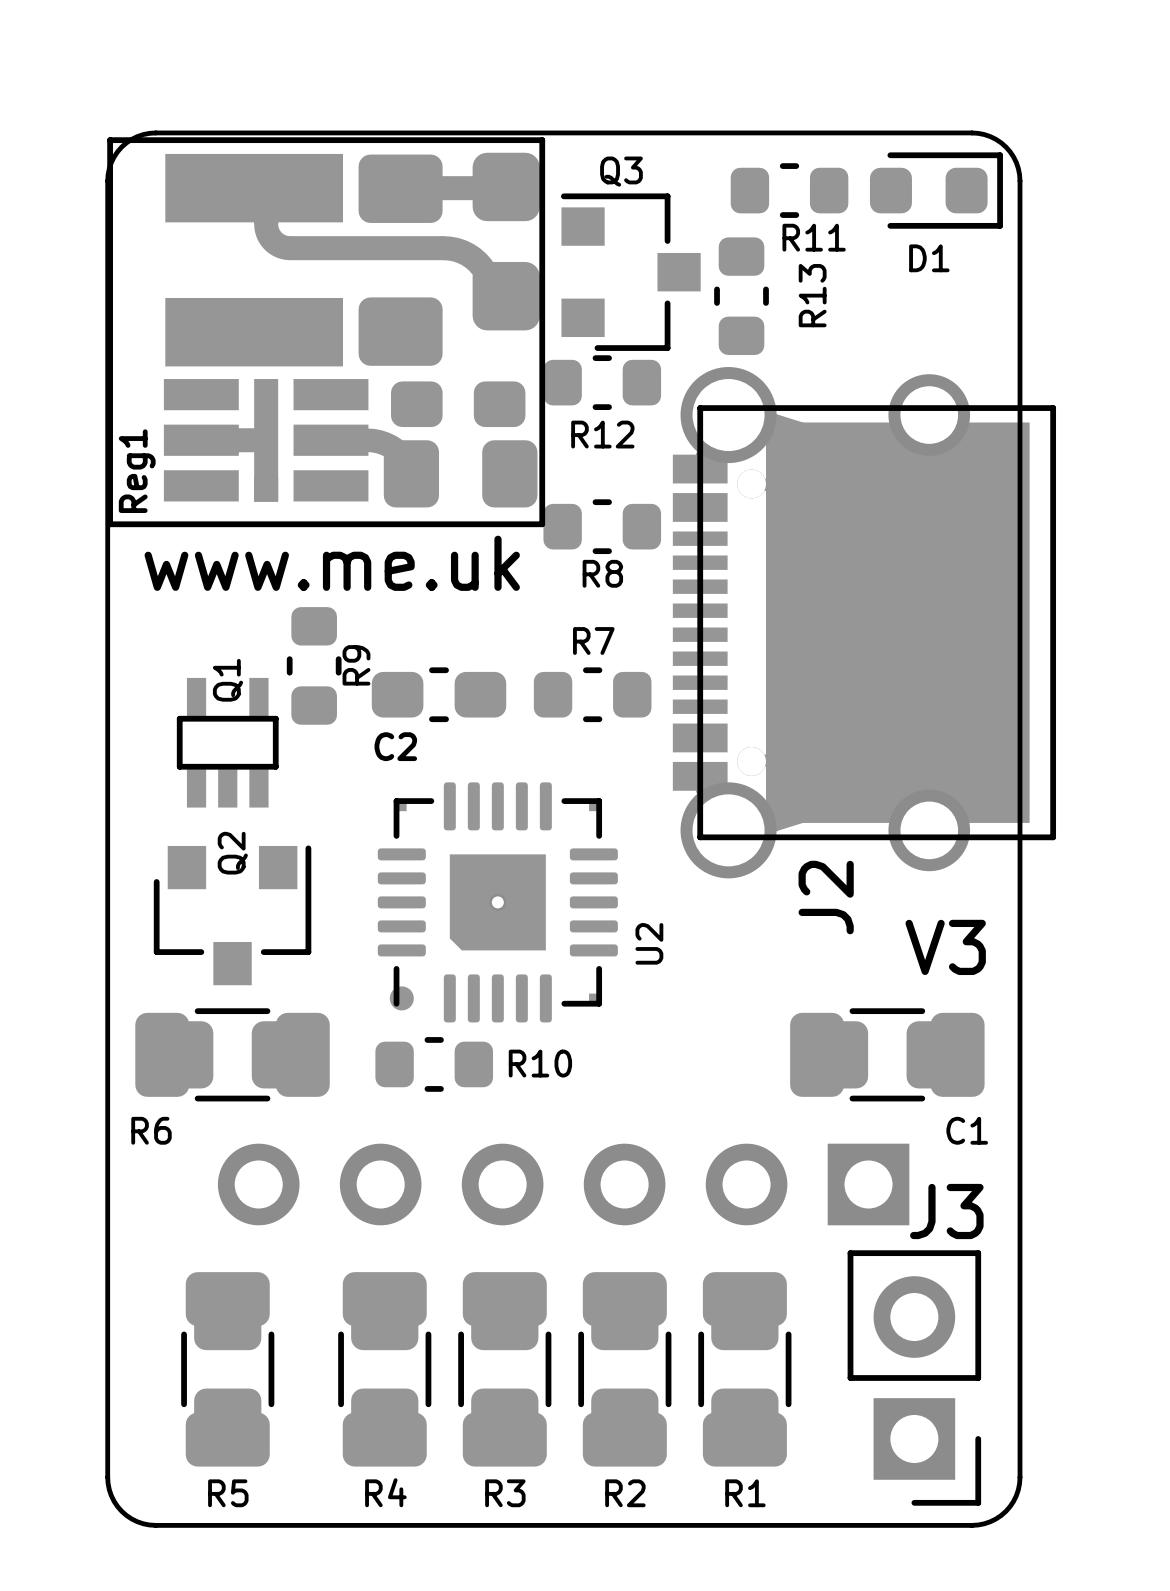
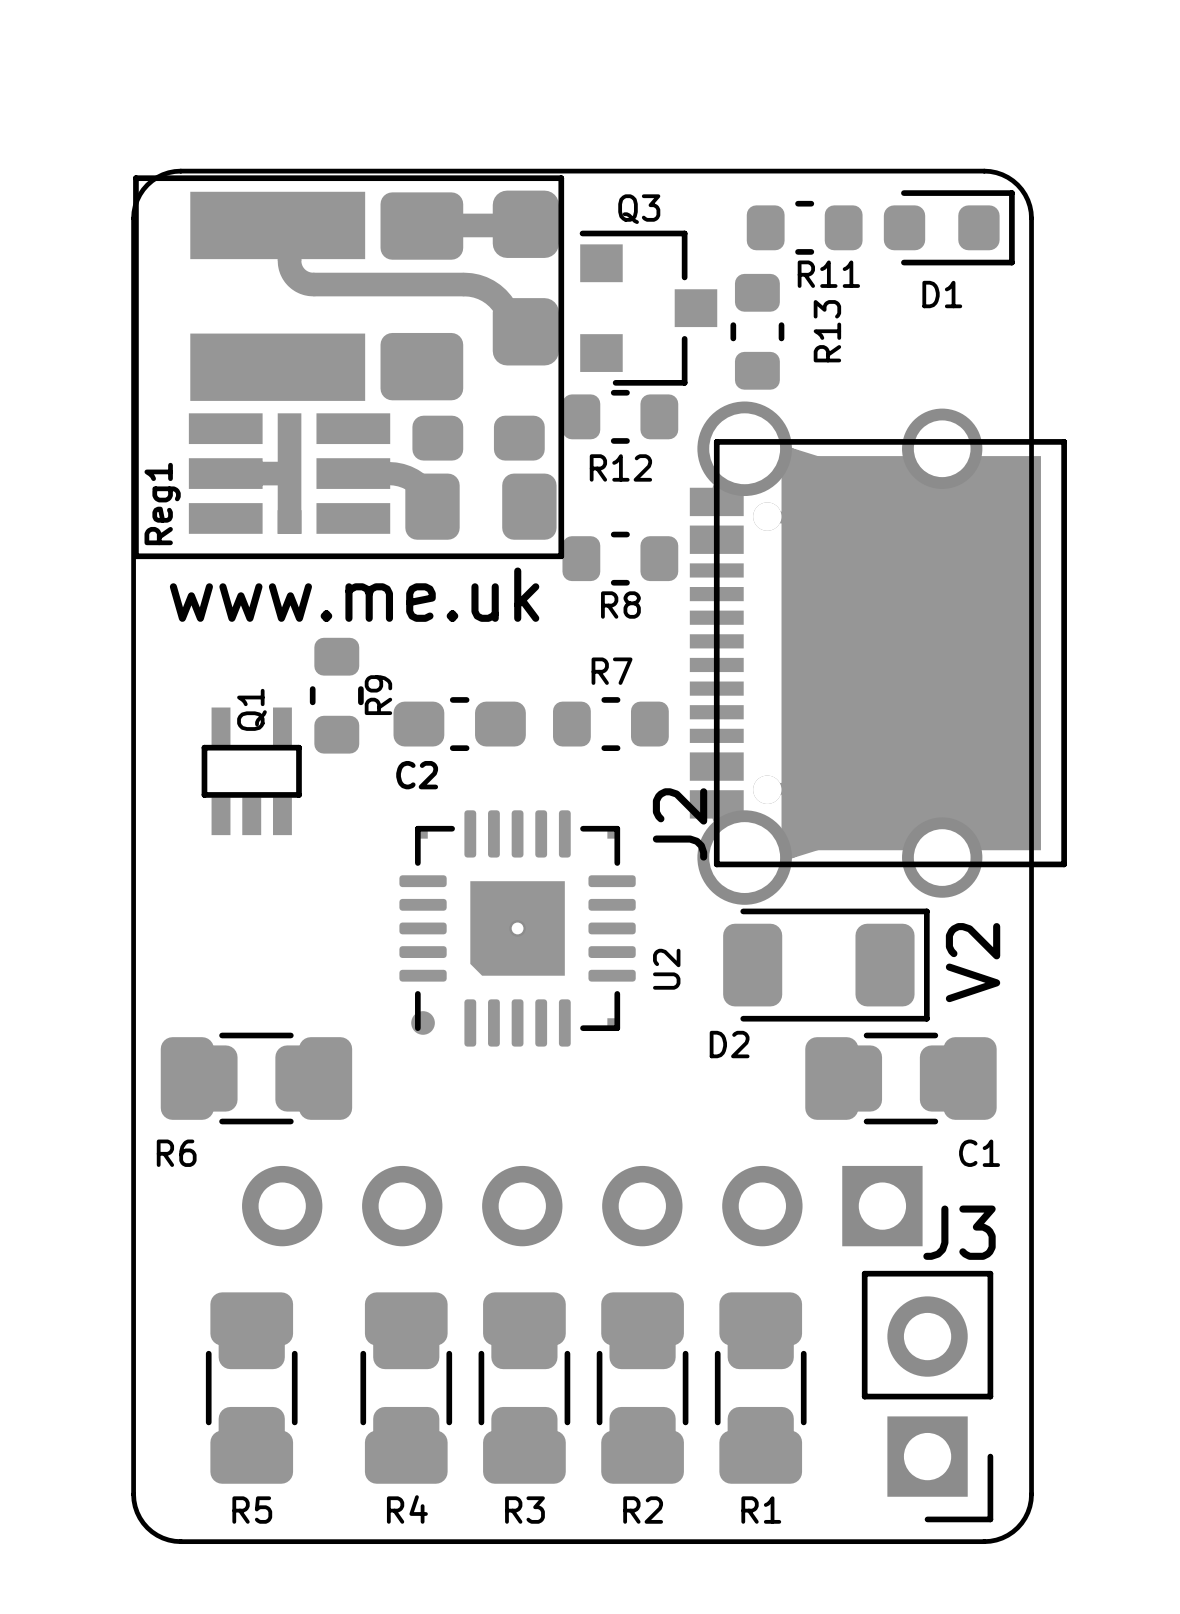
J2 name position: J2 (826, 897) -> J2 (680, 824)
Q2: (232, 915) -> none
D2: none -> (826, 965)
text: V3 (945, 947) -> V2 (973, 962)
R10: (434, 1064) -> none

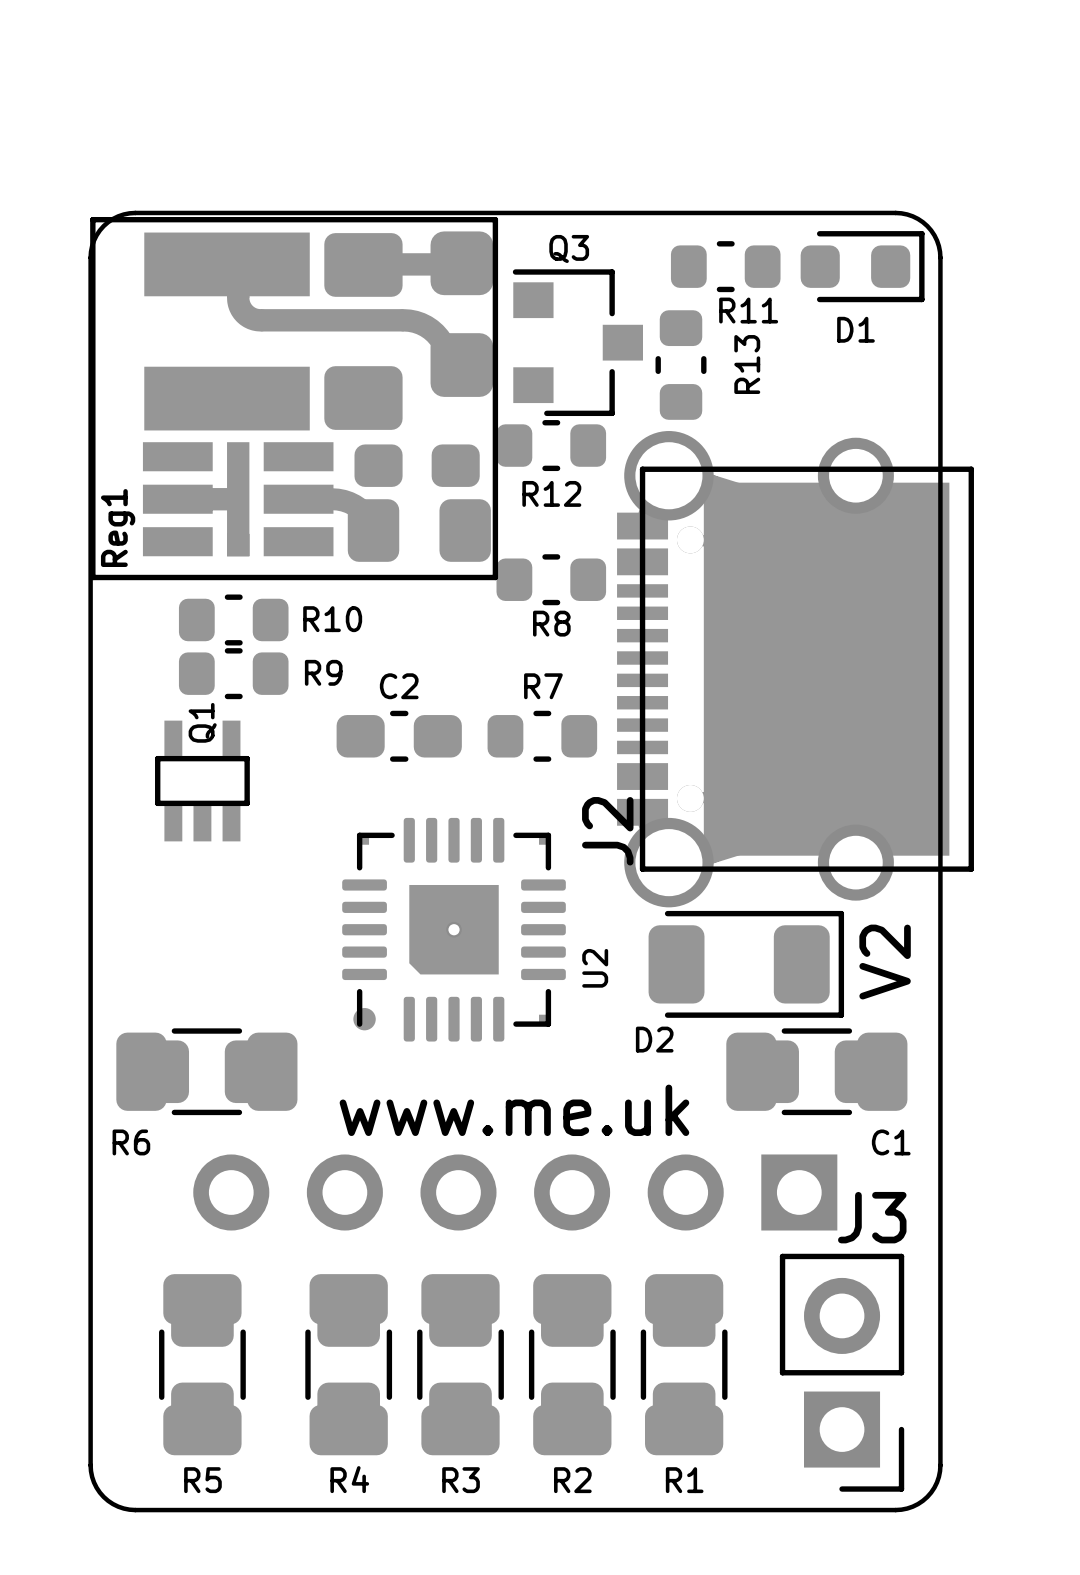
text position: www.me.uk (354, 594) -> www.me.uk (514, 1110)
R10: none -> (233, 619)
R9 rotation: 0° (336, 695) -> 90° clockwise (233, 673)
C2 name position: C2 (417, 775) -> C2 (399, 686)

